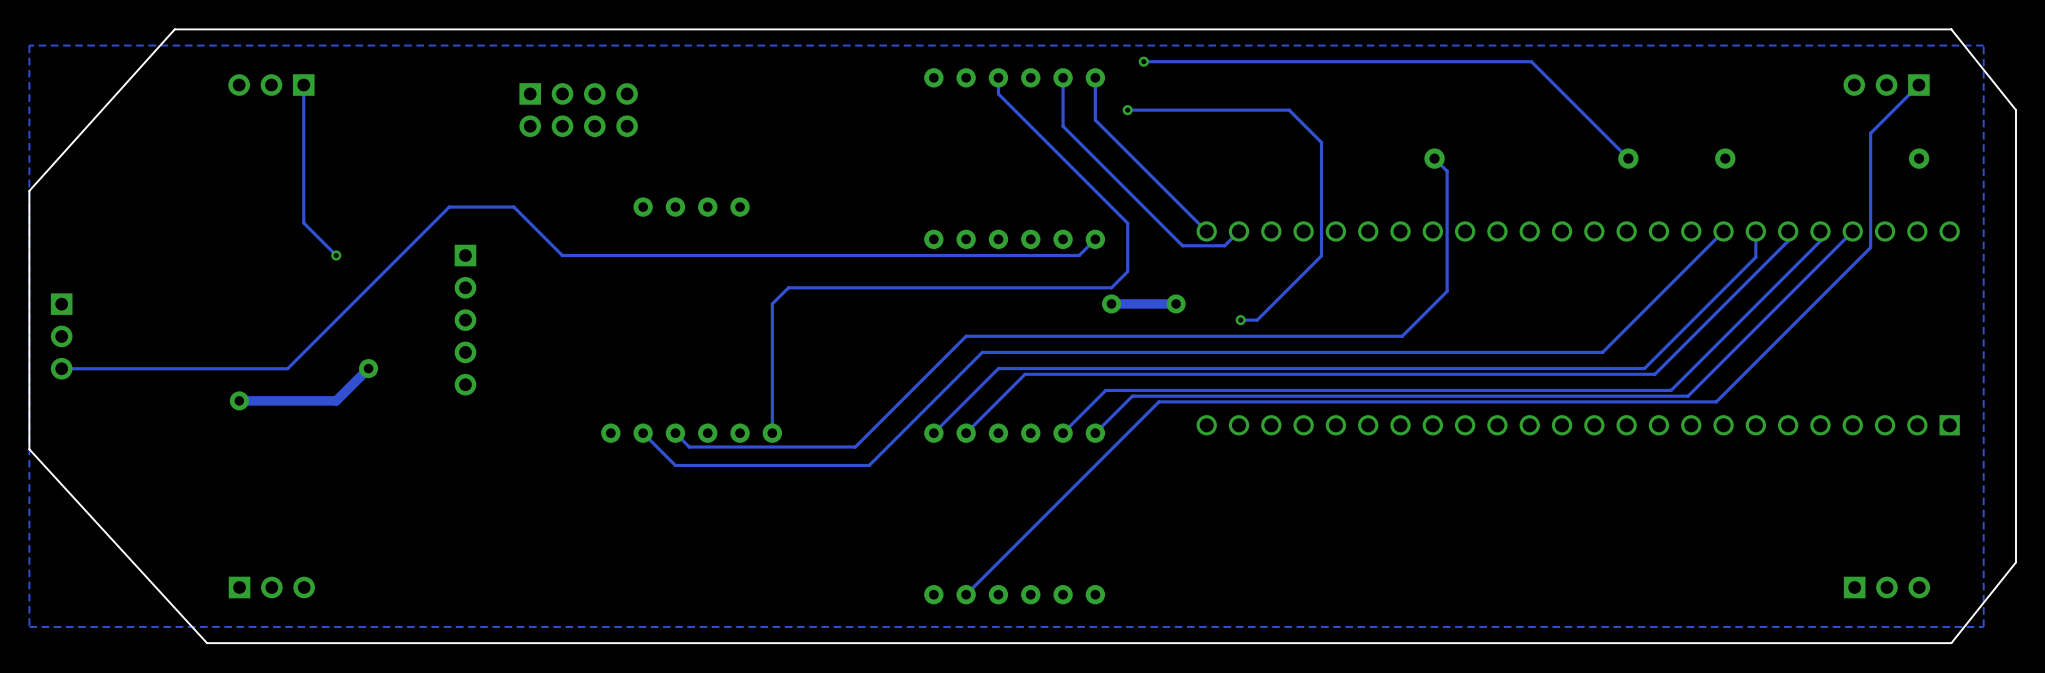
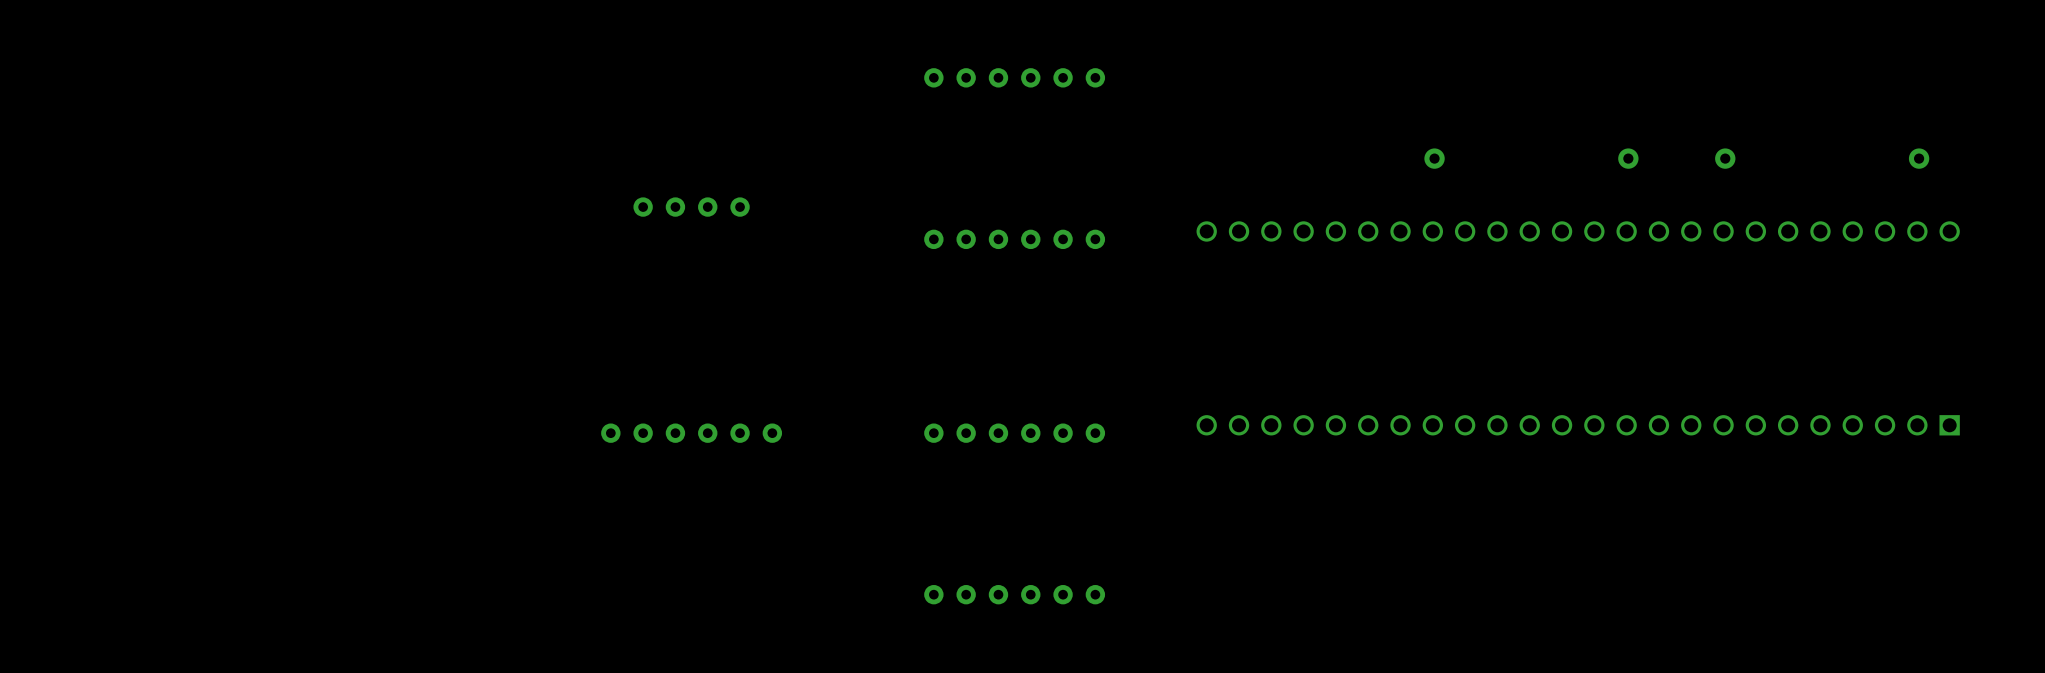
board edge: (1951, 29) (2015, 110) (2015, 562) (1951, 643) (207, 643) (29, 449) (29, 190) (174, 29) (1951, 29) -> none
zone outline: (1983, 45) (1983, 626) (29, 626) (29, 45) (1983, 45) -> none
track: (1143, 61) (1531, 61) (1628, 158) -> none
via: (1143, 61) -> none
track: (998, 77) (998, 93) (1127, 223) (1127, 271) (1111, 287) (788, 287) (772, 303) (772, 433) -> none
track: (1063, 77) (1063, 126) (1182, 245) (1224, 245) (1239, 231) -> none
track: (1095, 77) (1095, 120) (1206, 231) -> none
part: (271, 85) -> none
track: (303, 85) (303, 223) (336, 255) -> none
part: (1886, 85) -> none
track: (1918, 85) (1870, 133) (1870, 247) (1716, 401) (1158, 401) (966, 594) -> none
part: (578, 110) -> none
track: (1127, 110) (1289, 110) (1321, 142) (1321, 255) (1257, 320) (1240, 320) -> none
via: (1127, 110) -> none
track: (1434, 158) (1447, 171) (1447, 291) (1402, 336) (966, 336) (855, 446) (689, 446) (675, 433) -> none
track: (1723, 231) (1602, 352) (982, 352) (869, 465) (675, 465) (643, 433) -> none
track: (1755, 231) (1755, 257) (1644, 368) (998, 368) (933, 433) -> none
track: (1788, 231) (1788, 241) (1654, 374) (1025, 374) (966, 433) -> none
track: (1820, 231) (1820, 241) (1671, 390) (1105, 390) (1063, 433) -> none
track: (1852, 231) (1688, 396) (1132, 396) (1095, 433) -> none
track: (1095, 239) (1079, 255) (562, 255) (513, 207) (449, 207) (287, 368) (61, 368) -> none
via: (336, 255) -> none
via: (1111, 303) -> none
track: (1176, 303) (1111, 303) -> none
via: (1176, 303) -> none
part: (465, 320) -> none
via: (1240, 320) -> none
part: (61, 336) -> none
track: (368, 368) (336, 400) (239, 400) -> none
via: (368, 368) -> none
via: (239, 400) -> none
part: (271, 587) -> none
part: (1886, 587) -> none

